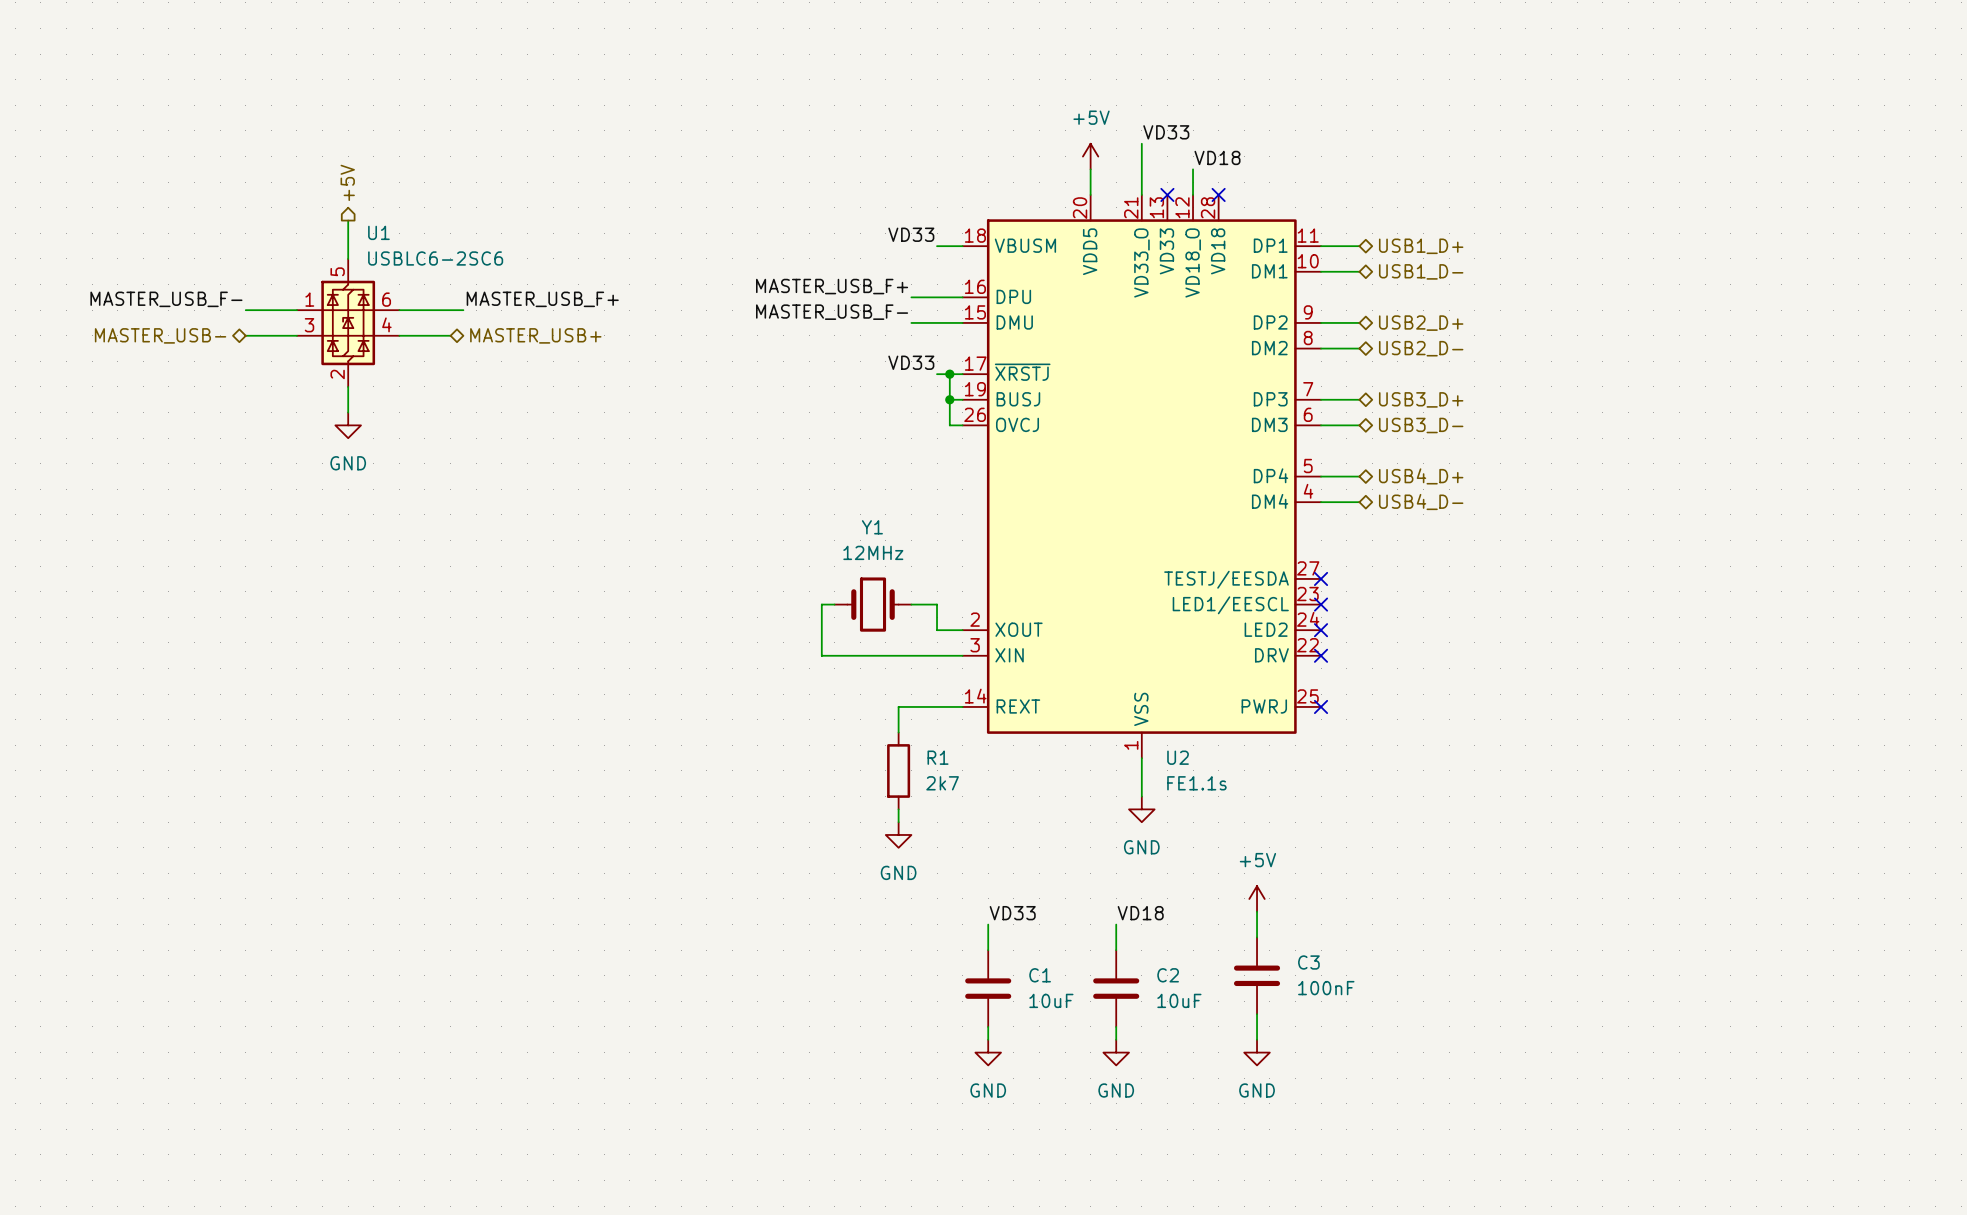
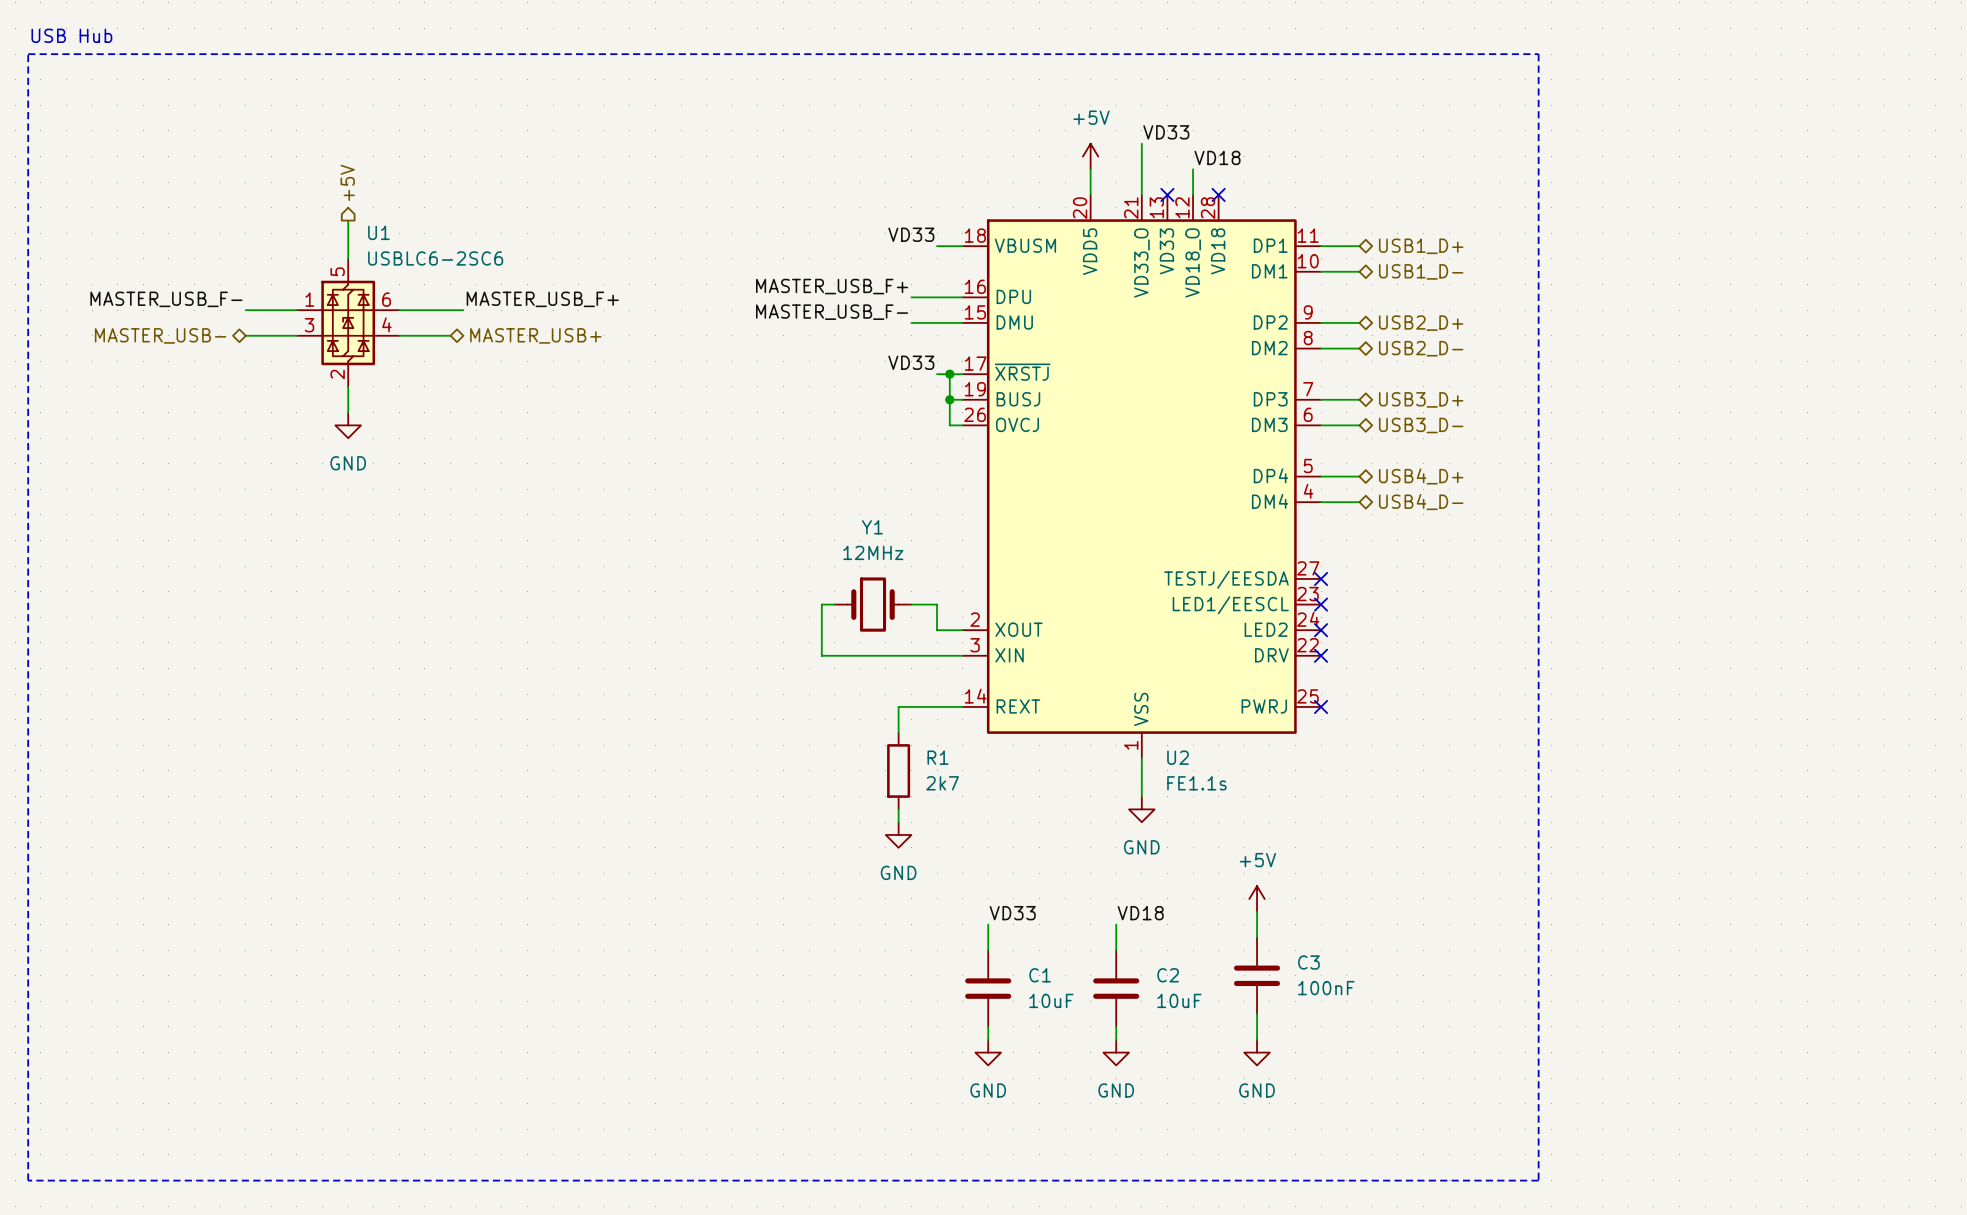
text: none -> USB Hub (71, 35)
line: none -> (28, 54) (1538, 54) (1538, 1180) (28, 1180) (28, 54)

